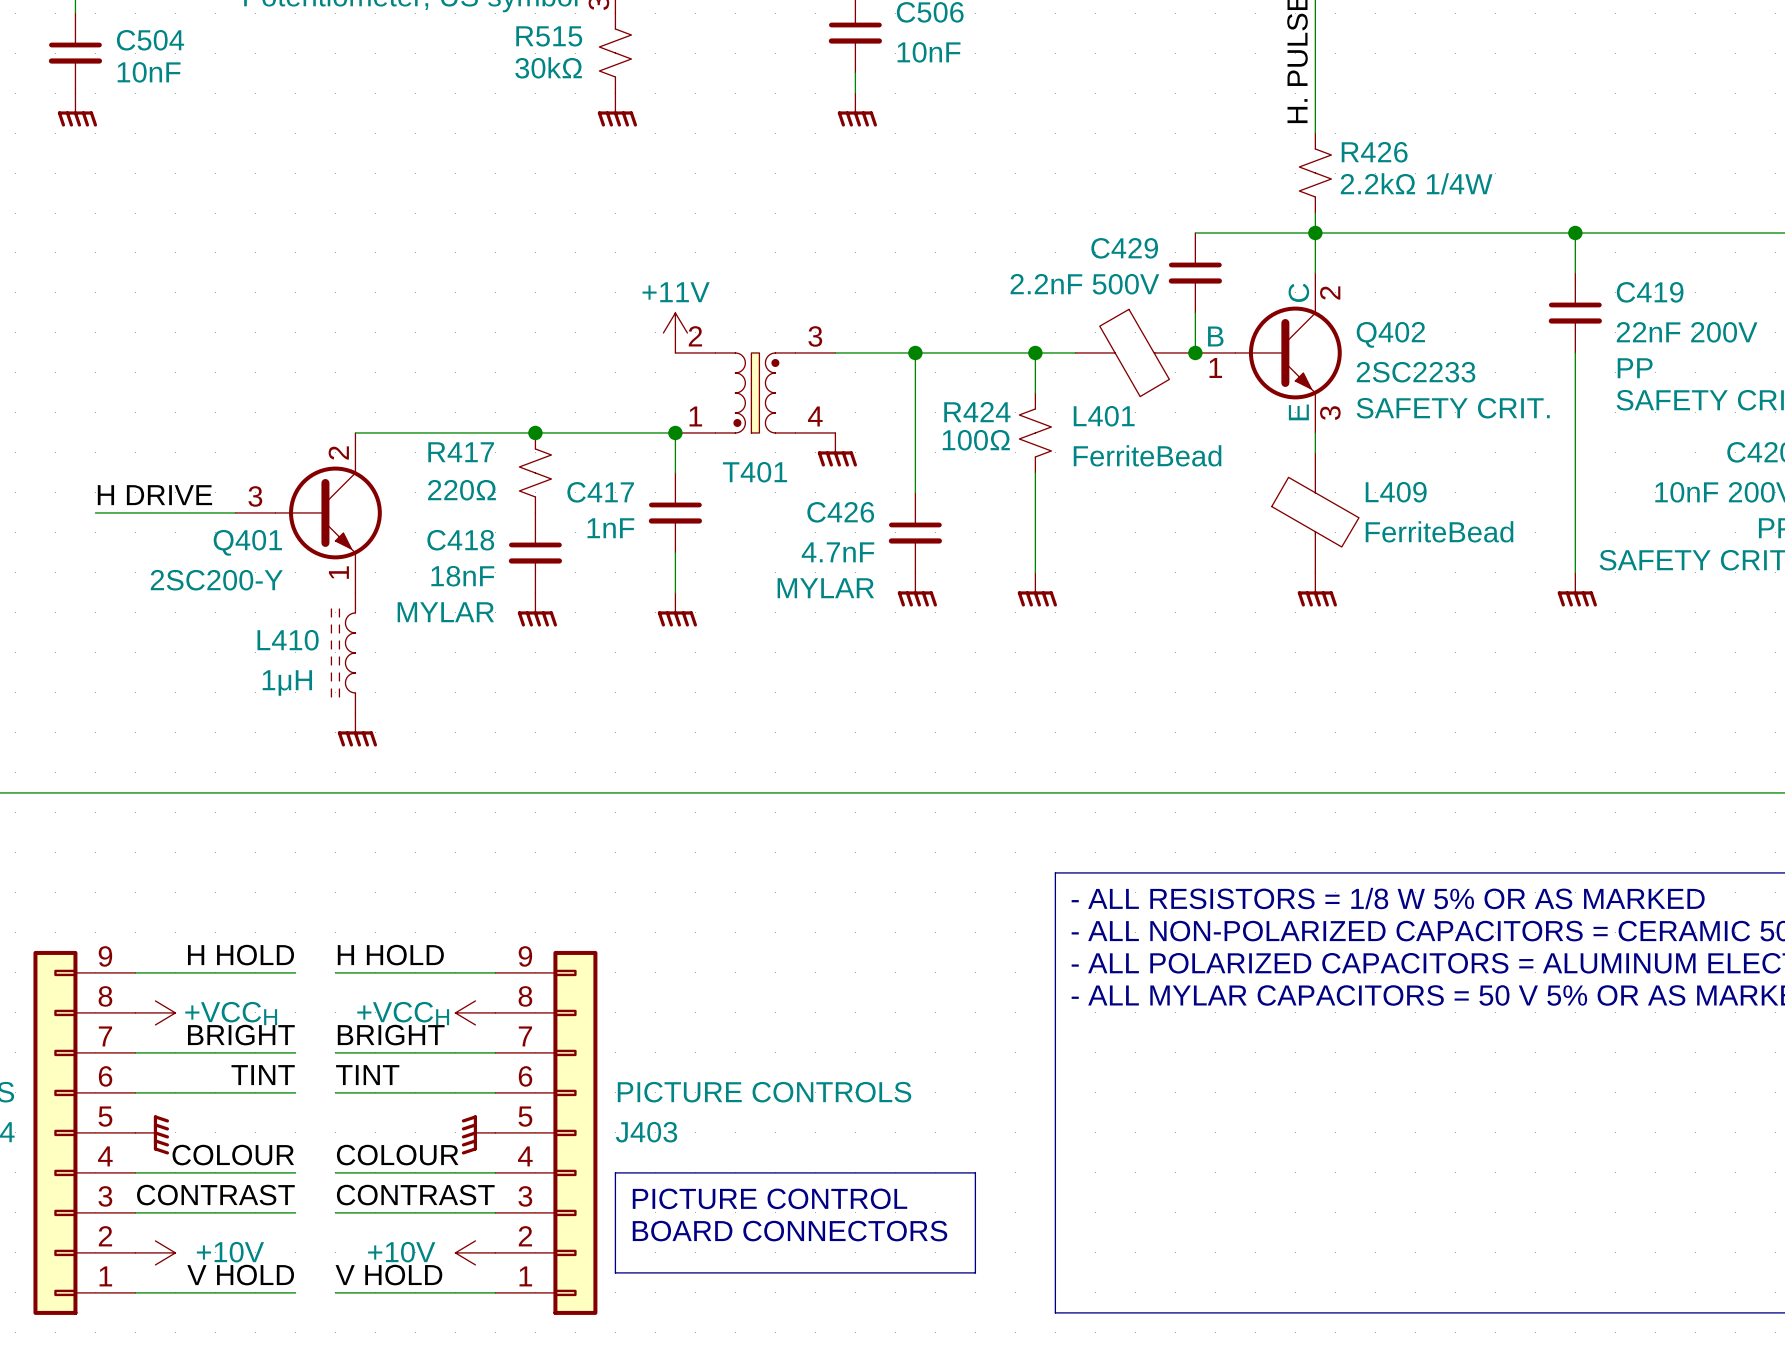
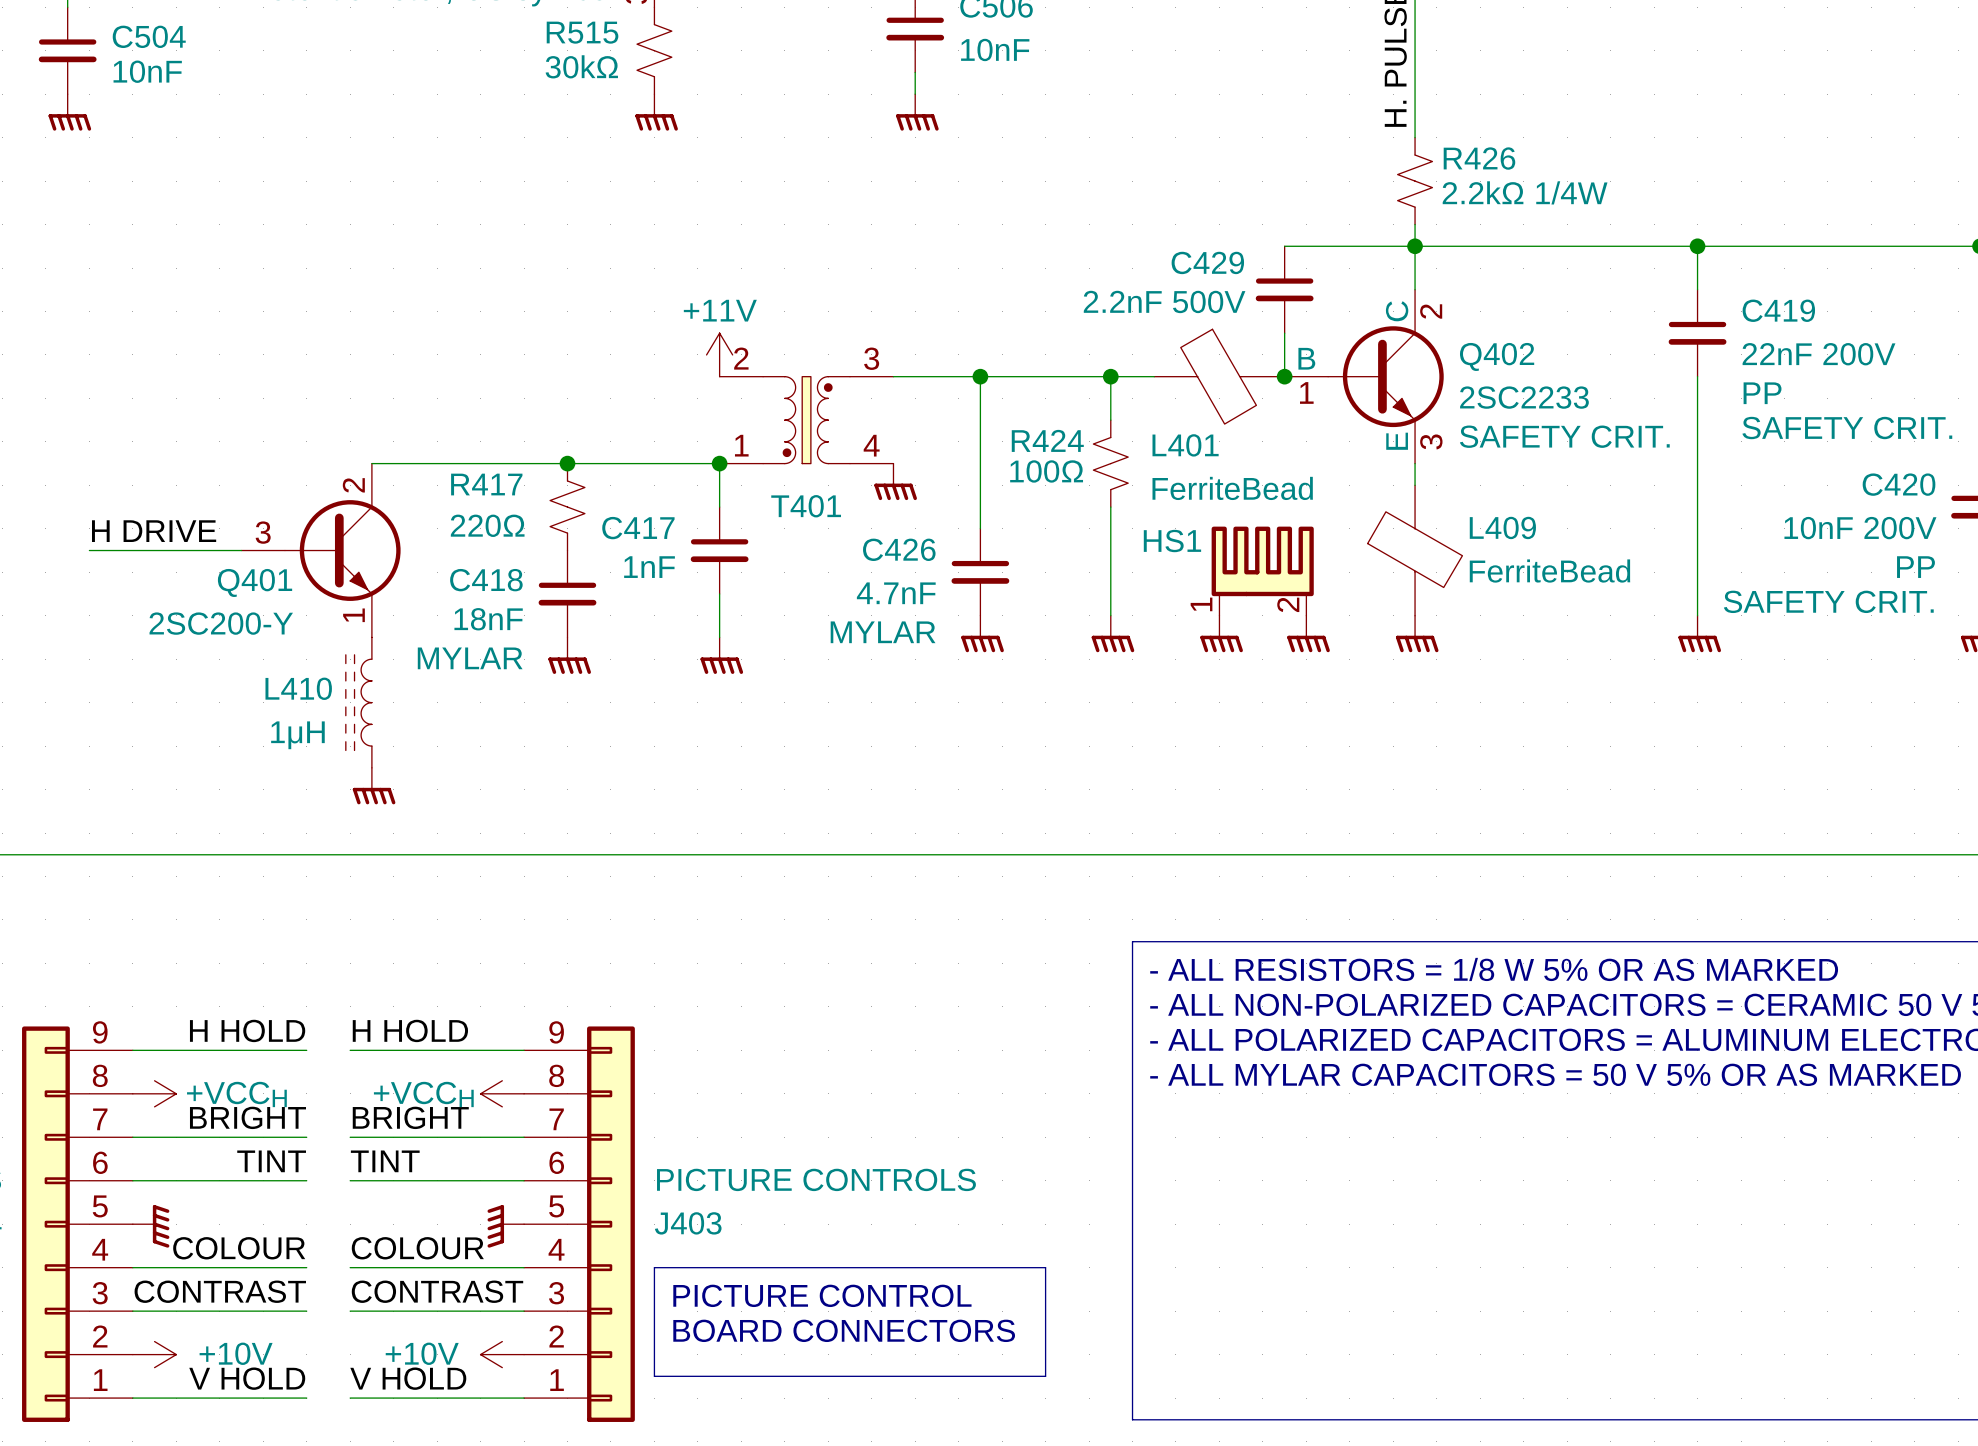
HS1: none -> (1262, 571)
power symbol: none -> (1221, 633)
power symbol: none -> (1308, 633)

